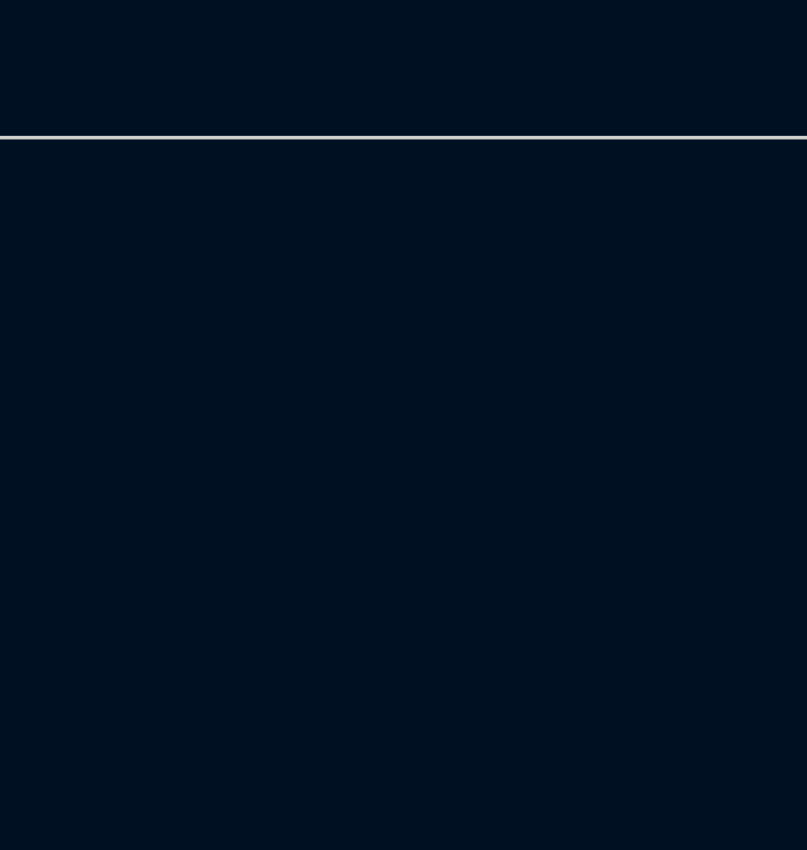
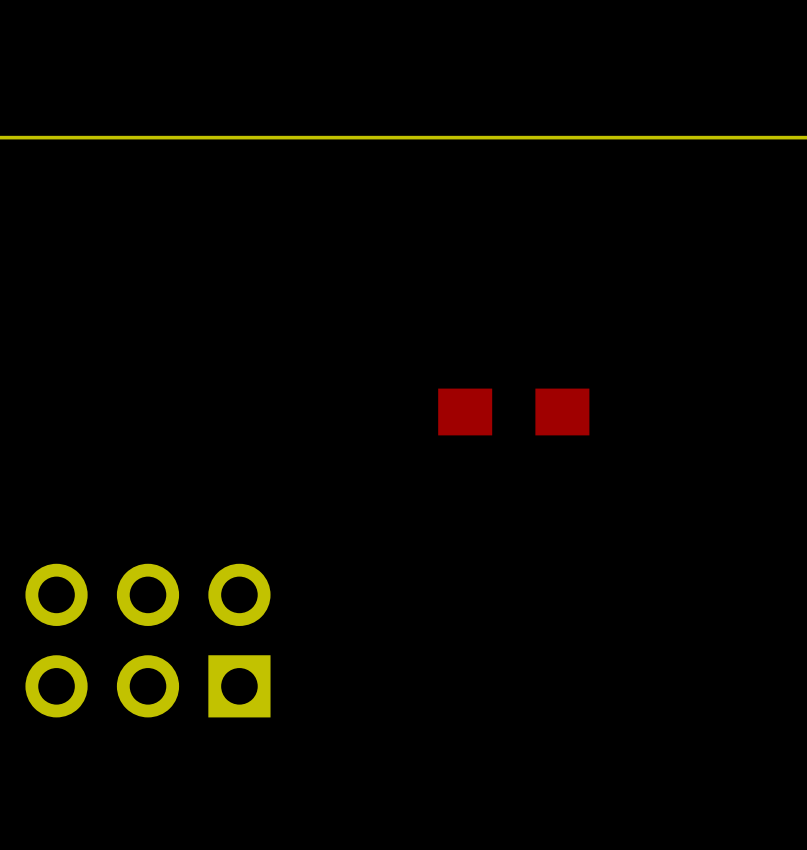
part: none -> (513, 411)
part: none -> (147, 640)

